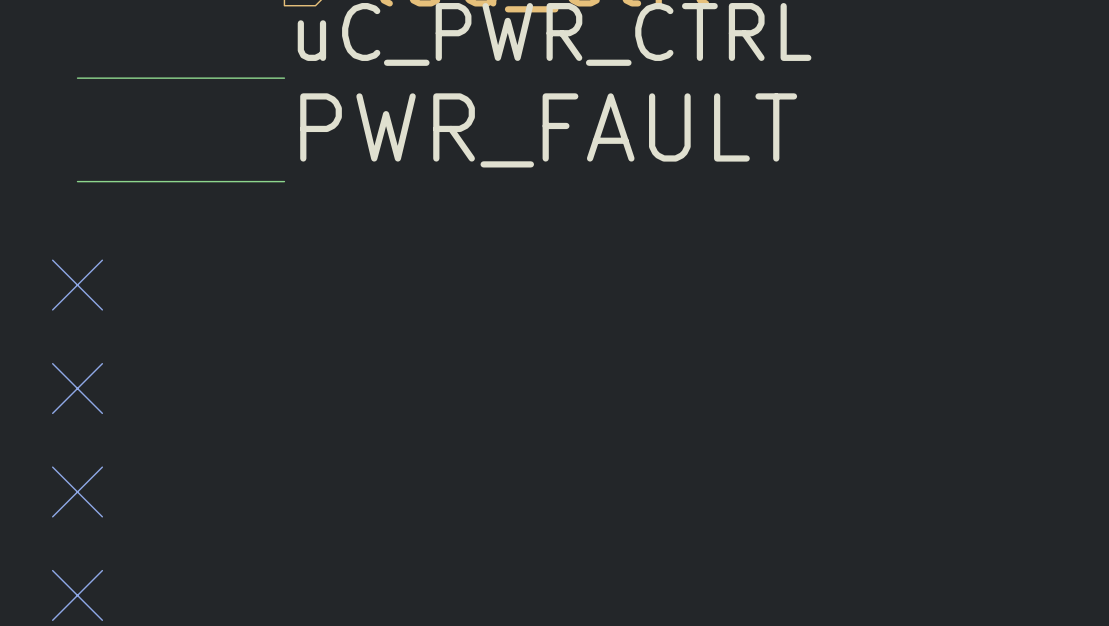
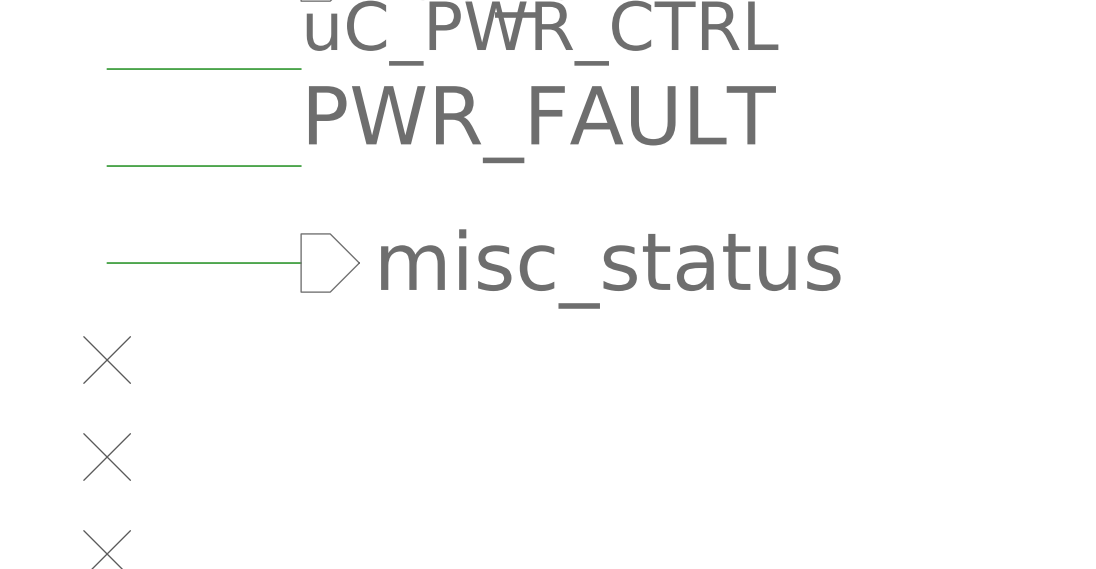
wire: none -> (107, 263) (301, 263)
no-connect mark: (77, 285) -> none
hierarchical label: none -> misc_status (610, 269)

